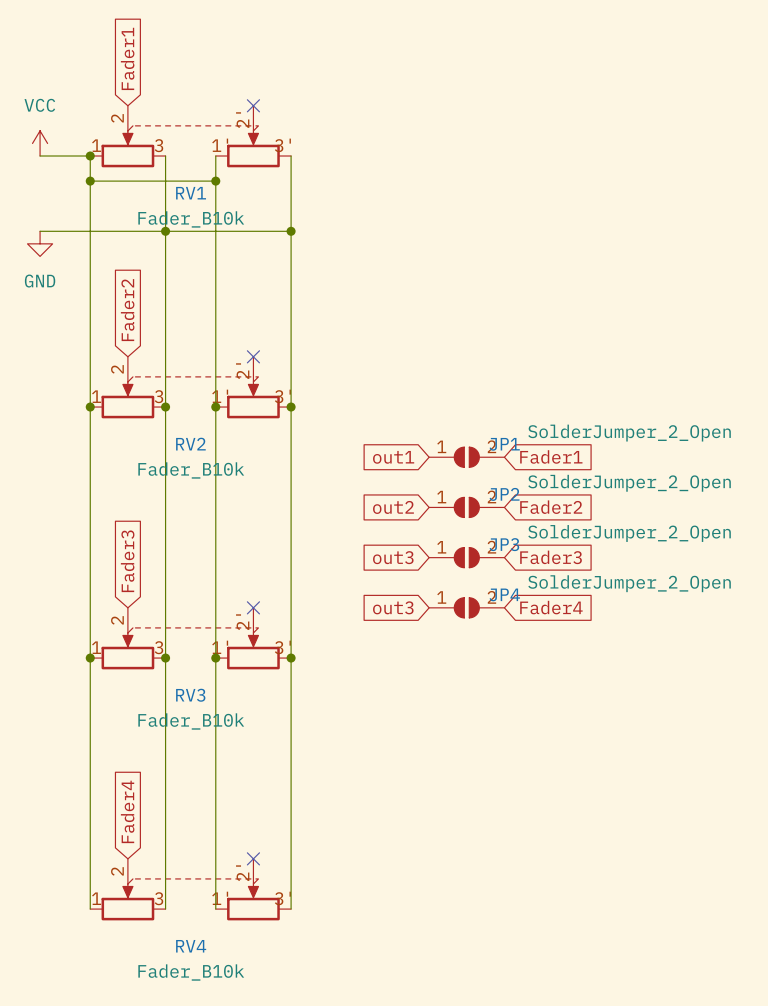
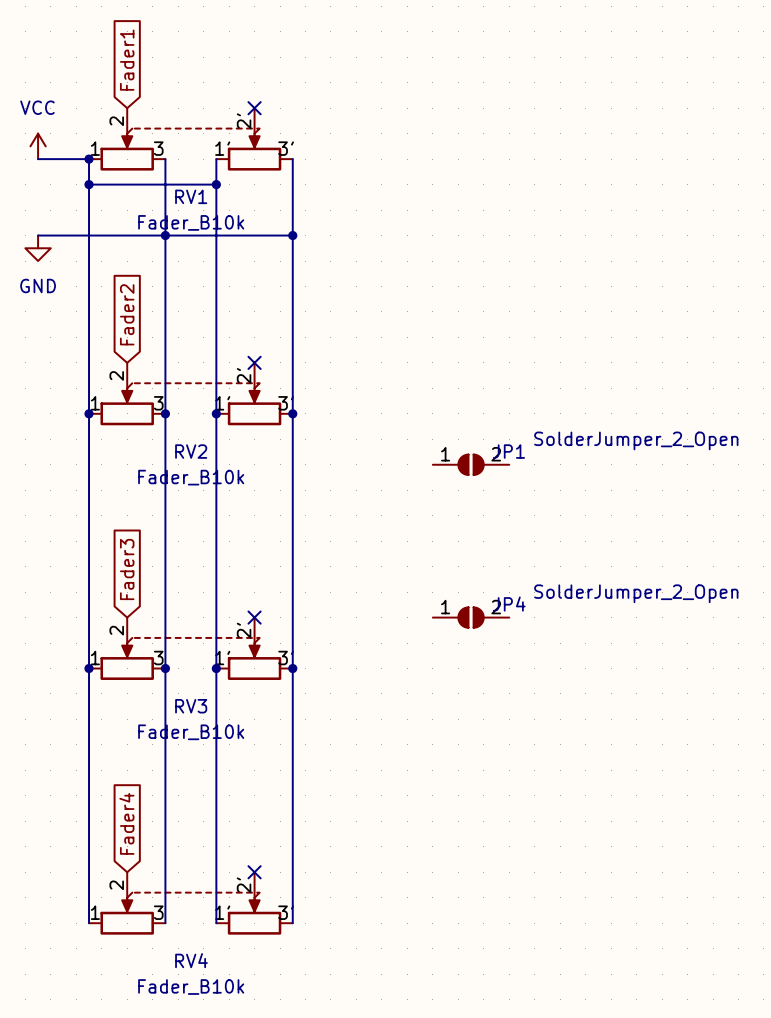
global label: Fader1 (551, 456) -> none
global label: out1 (393, 457) -> none
global label: out2 (393, 507) -> none
JP2: SolderJumper_2_Open (466, 507) -> none
global label: Fader2 (551, 507) -> none
global label: out3 (393, 557) -> none
JP3: SolderJumper_2_Open (466, 557) -> none
global label: Fader3 (551, 557) -> none
global label: out3 (393, 607) -> none
global label: Fader4 (551, 607) -> none

